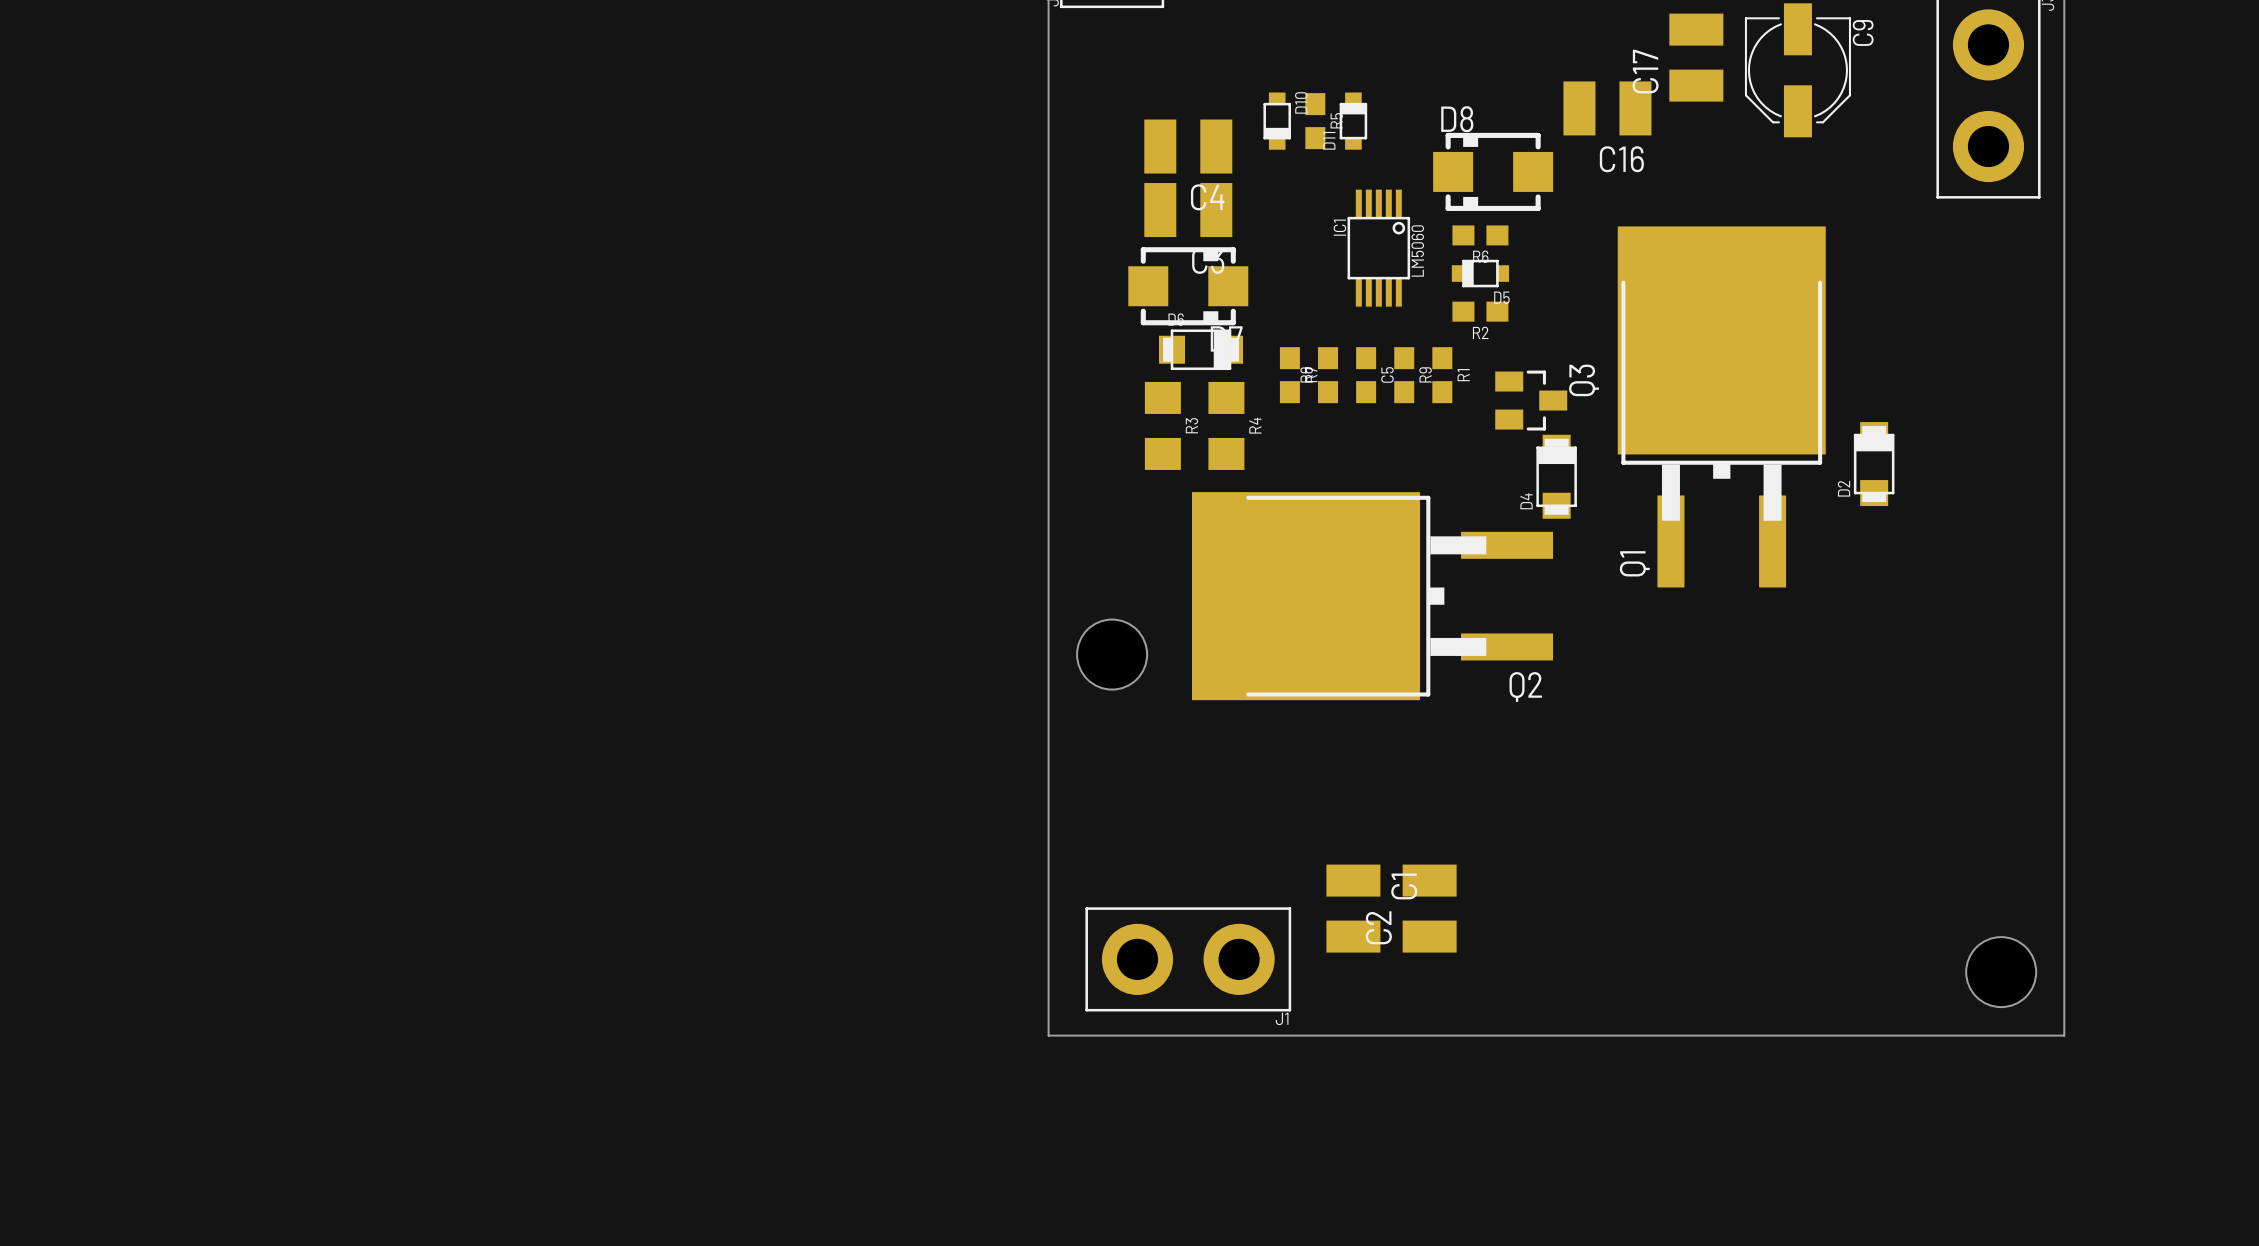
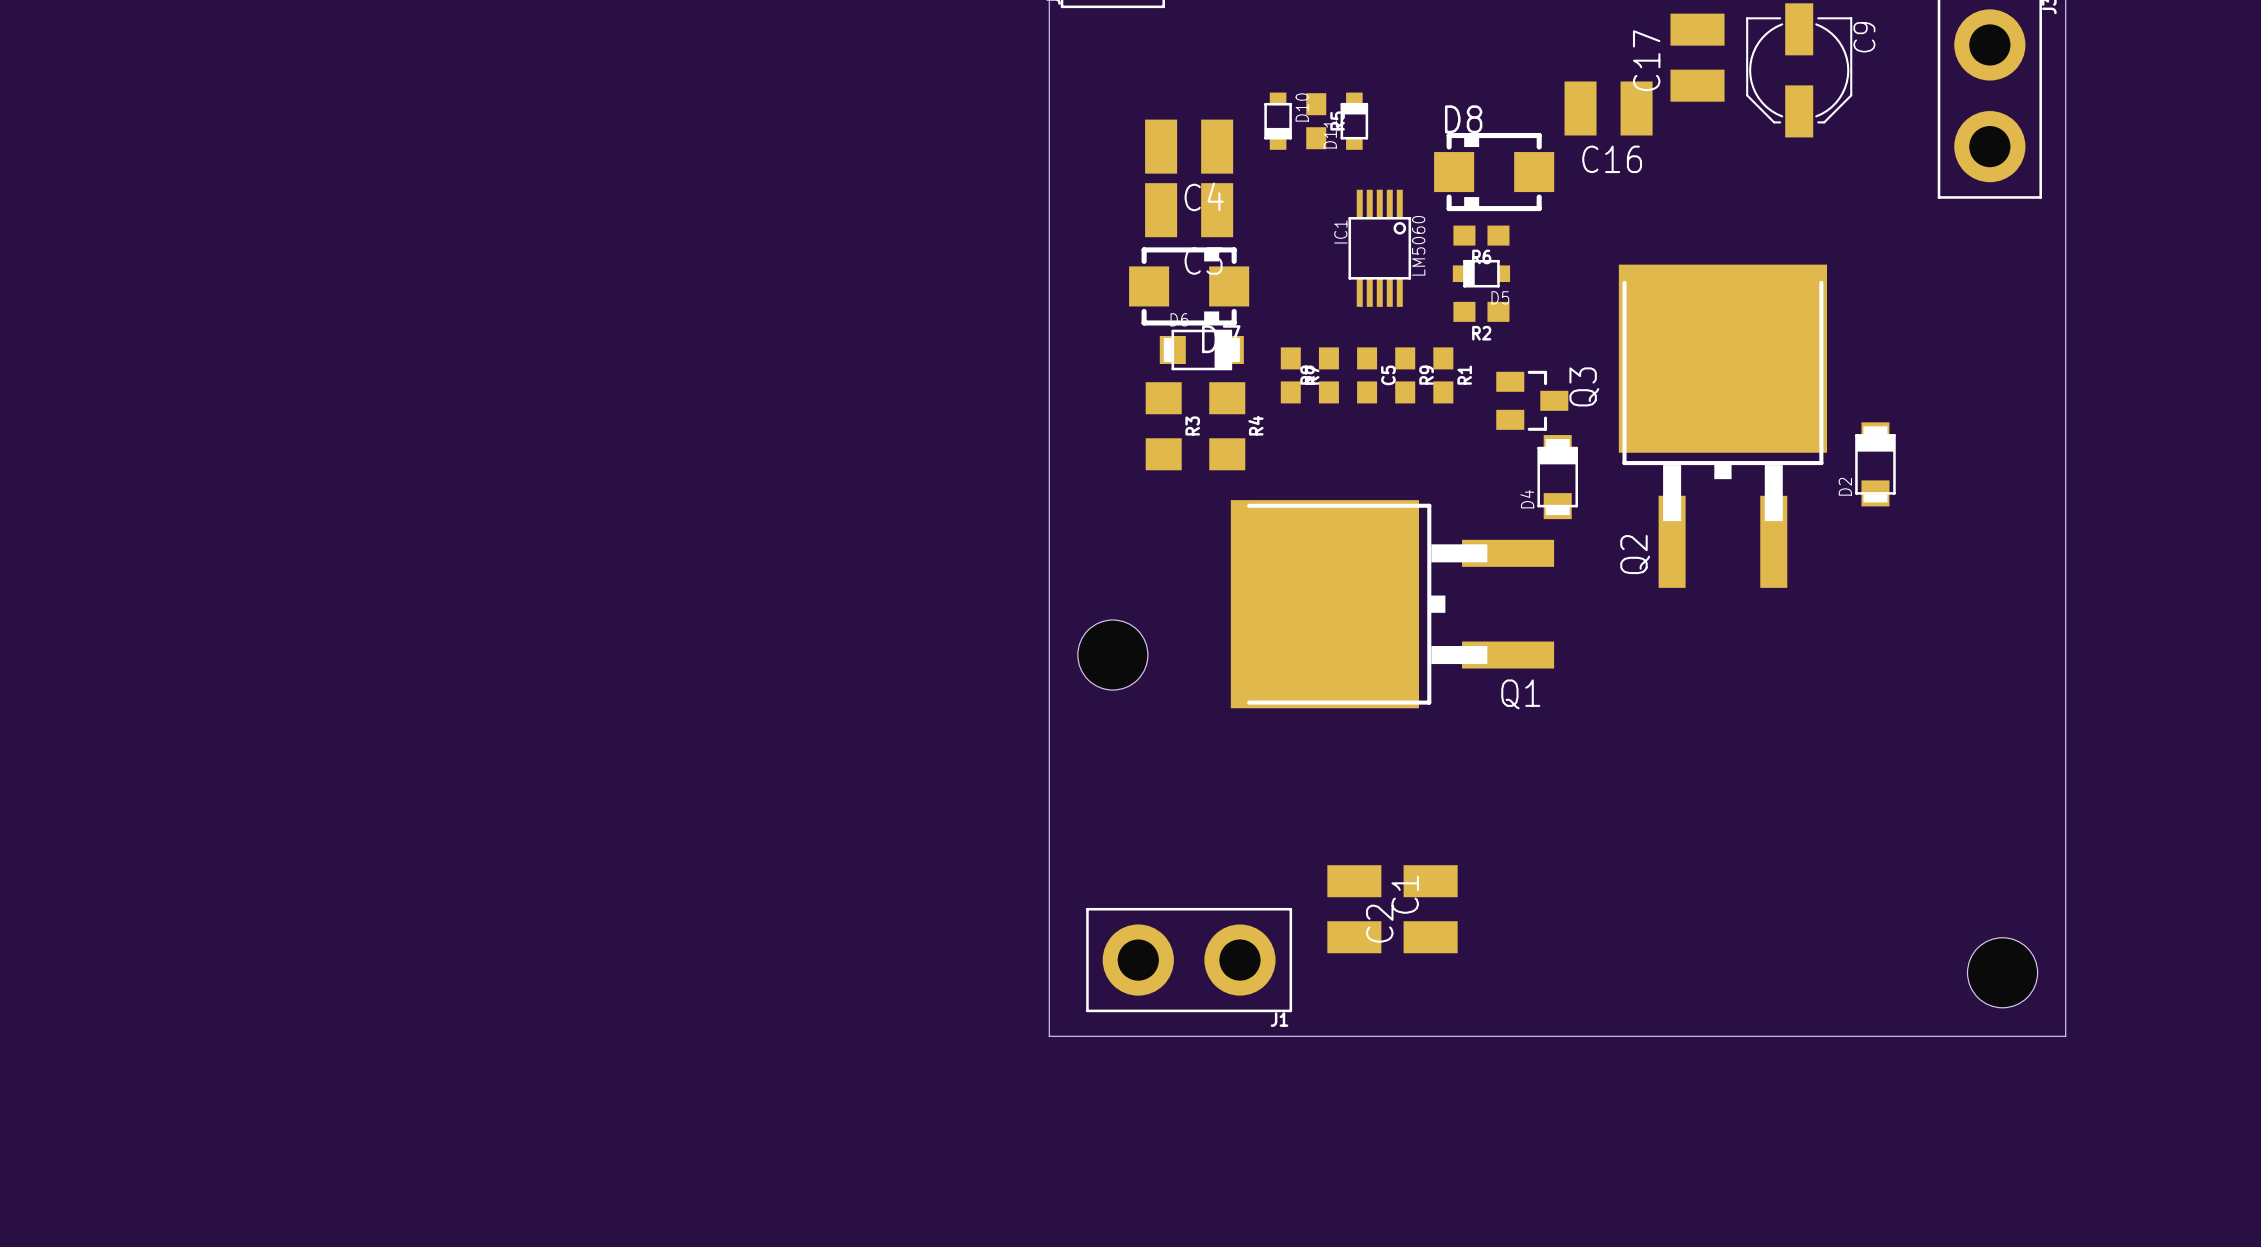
Q1 footprint: [1617, 226, 1826, 588] -> [1230, 500, 1555, 709]
Q2 footprint: [1192, 492, 1554, 701] -> [1618, 264, 1828, 588]
Q1 name position: Q1 (1634, 563) -> Q1 (1520, 694)
Q2 name position: Q2 (1525, 686) -> Q2 (1635, 554)

